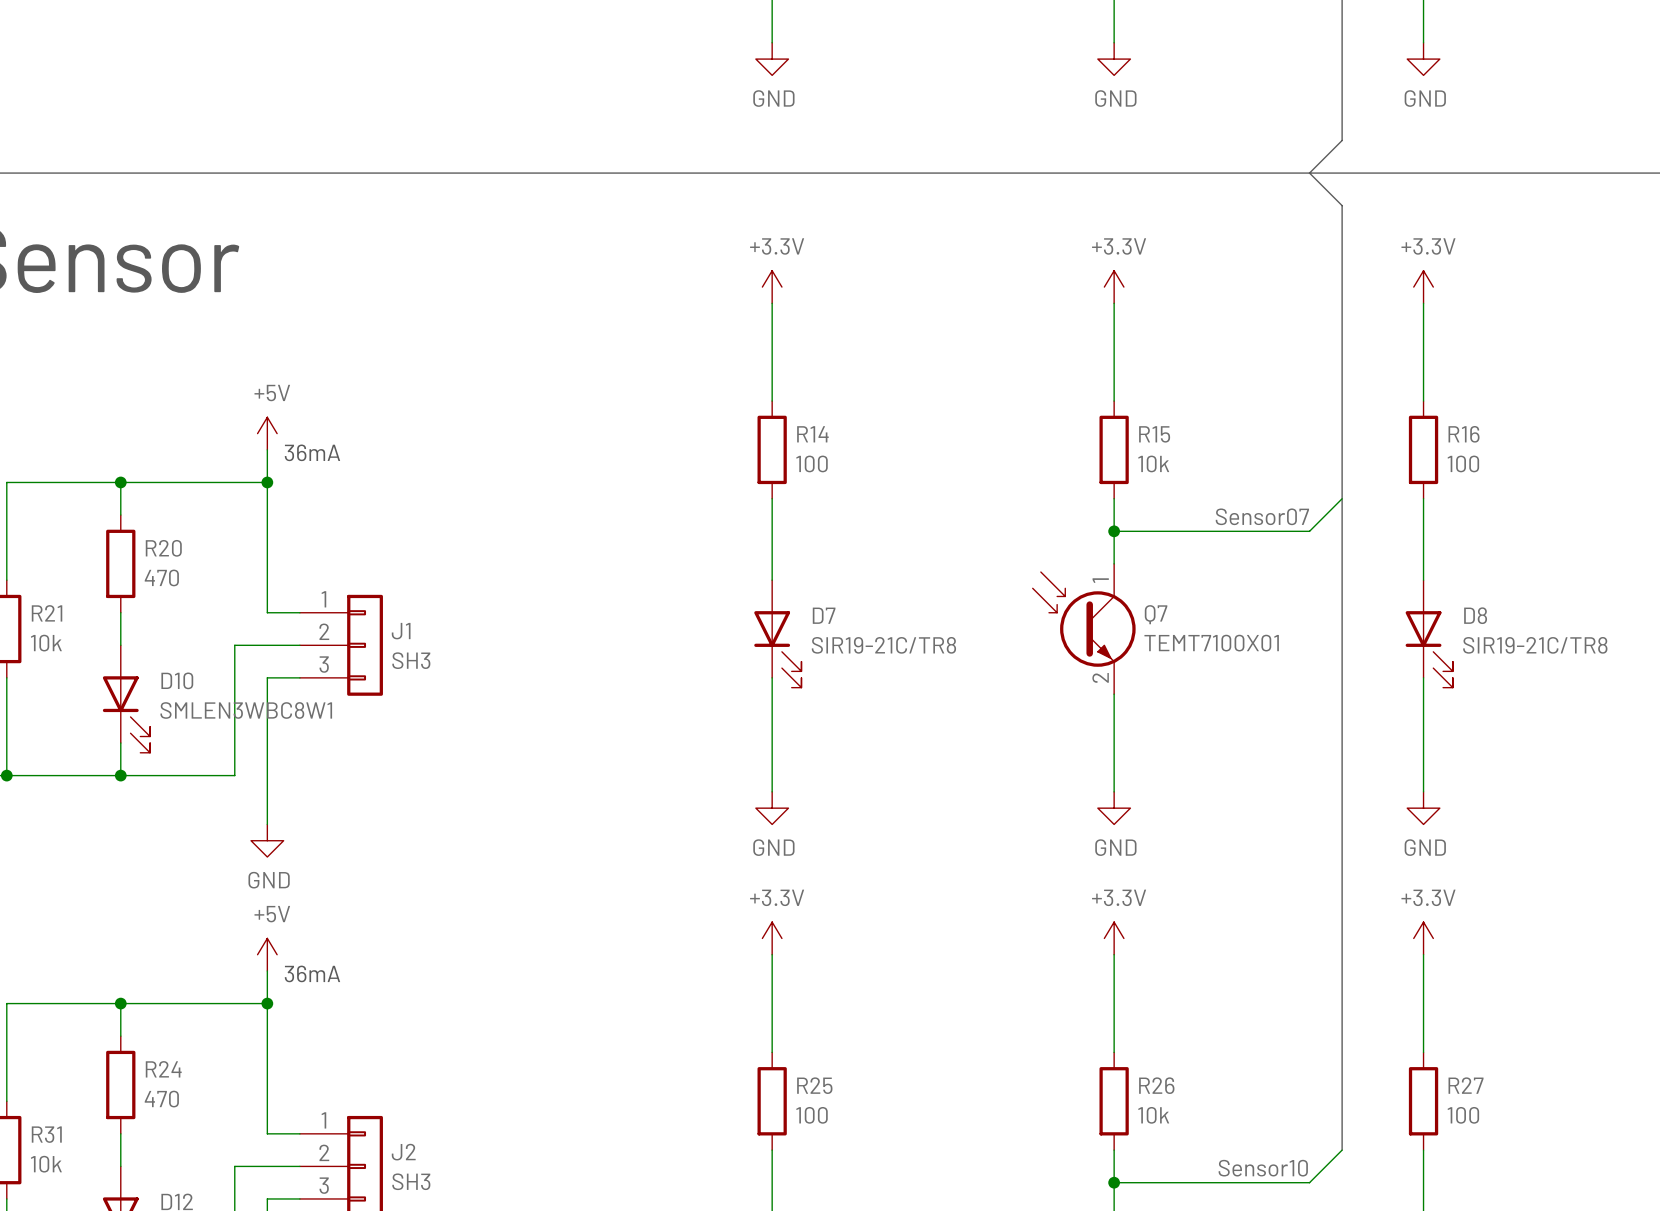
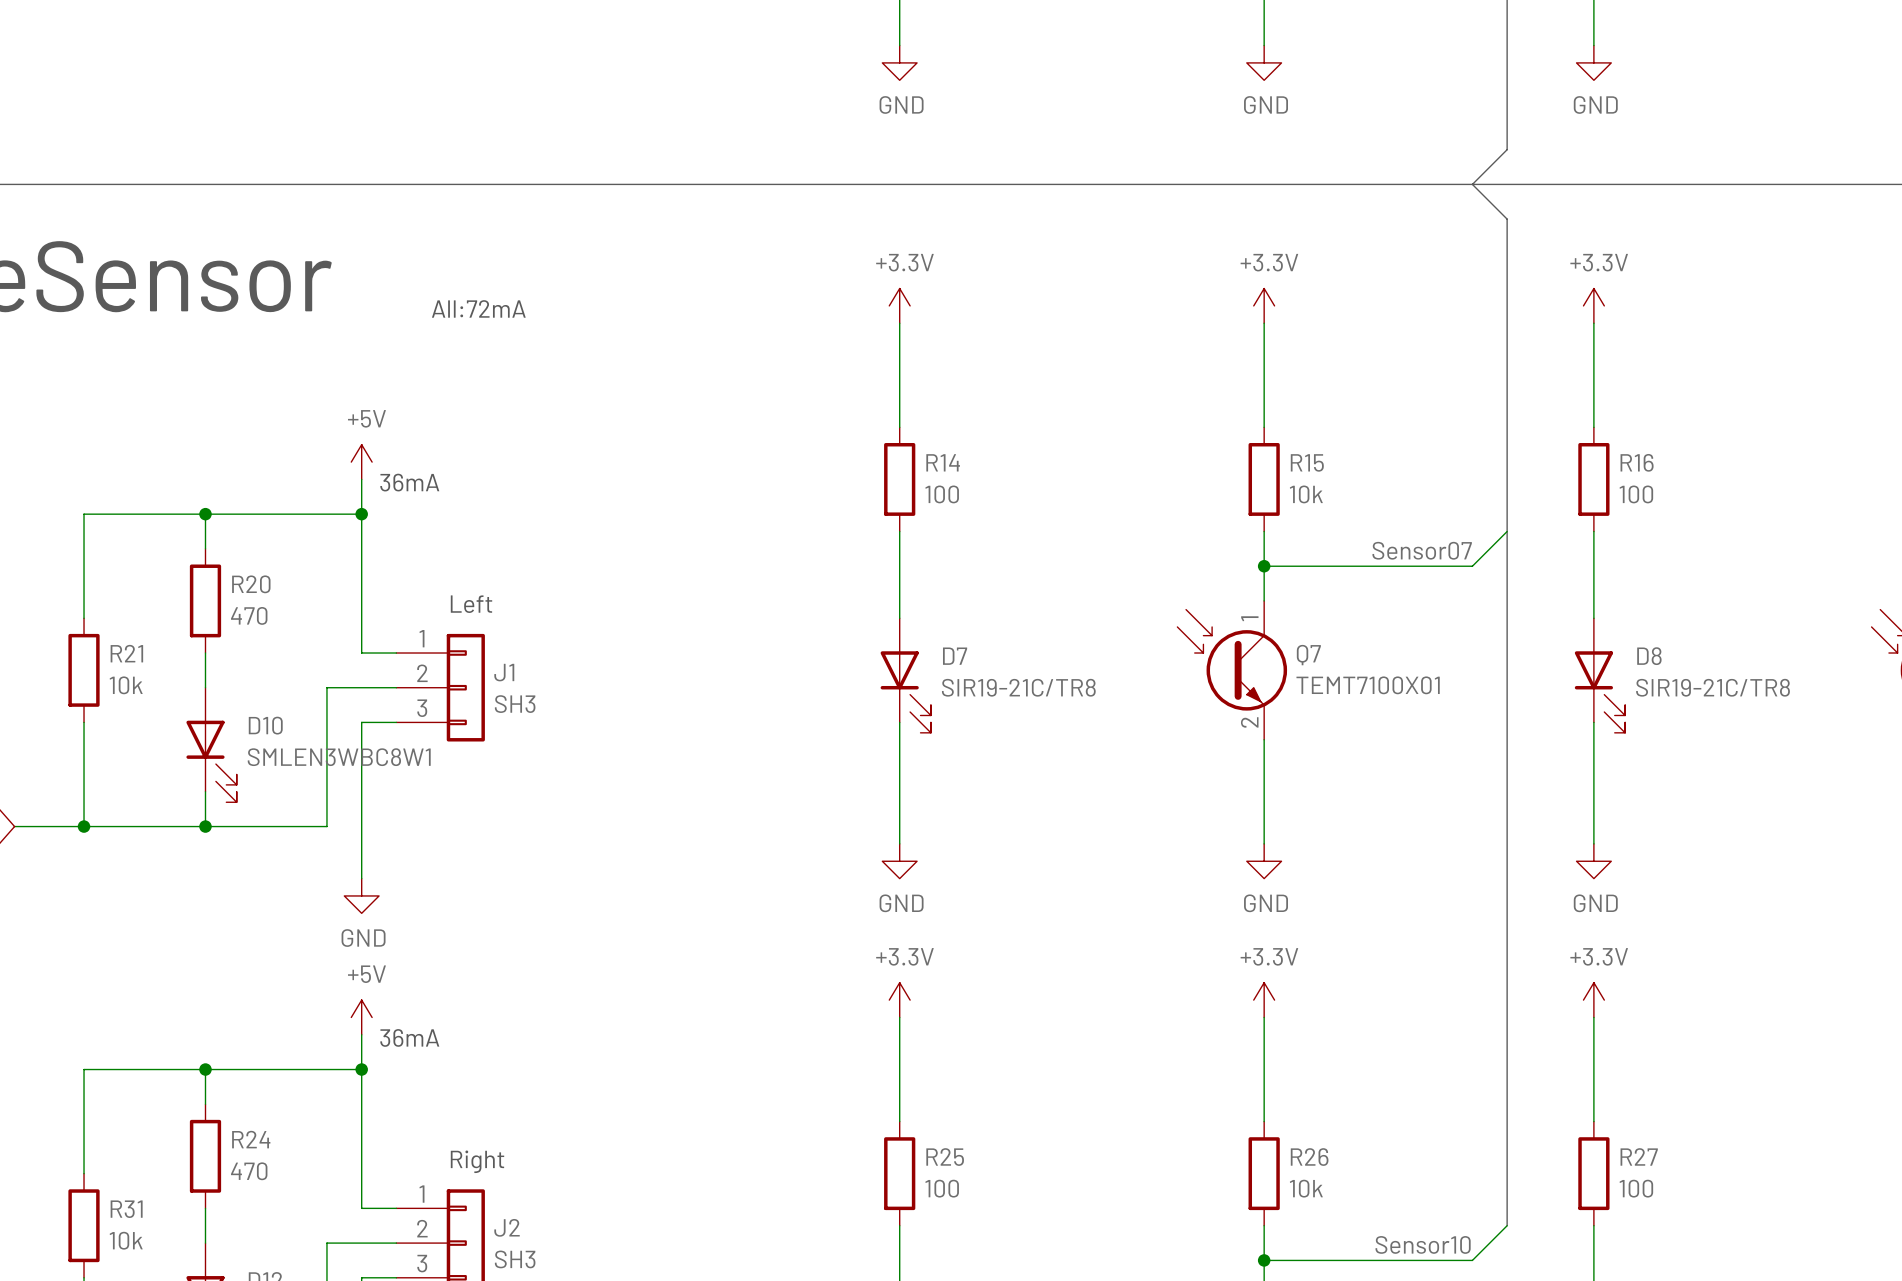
text: none -> All:72mA (478, 308)
text: none -> Left (471, 604)
text: none -> Right (477, 1161)

